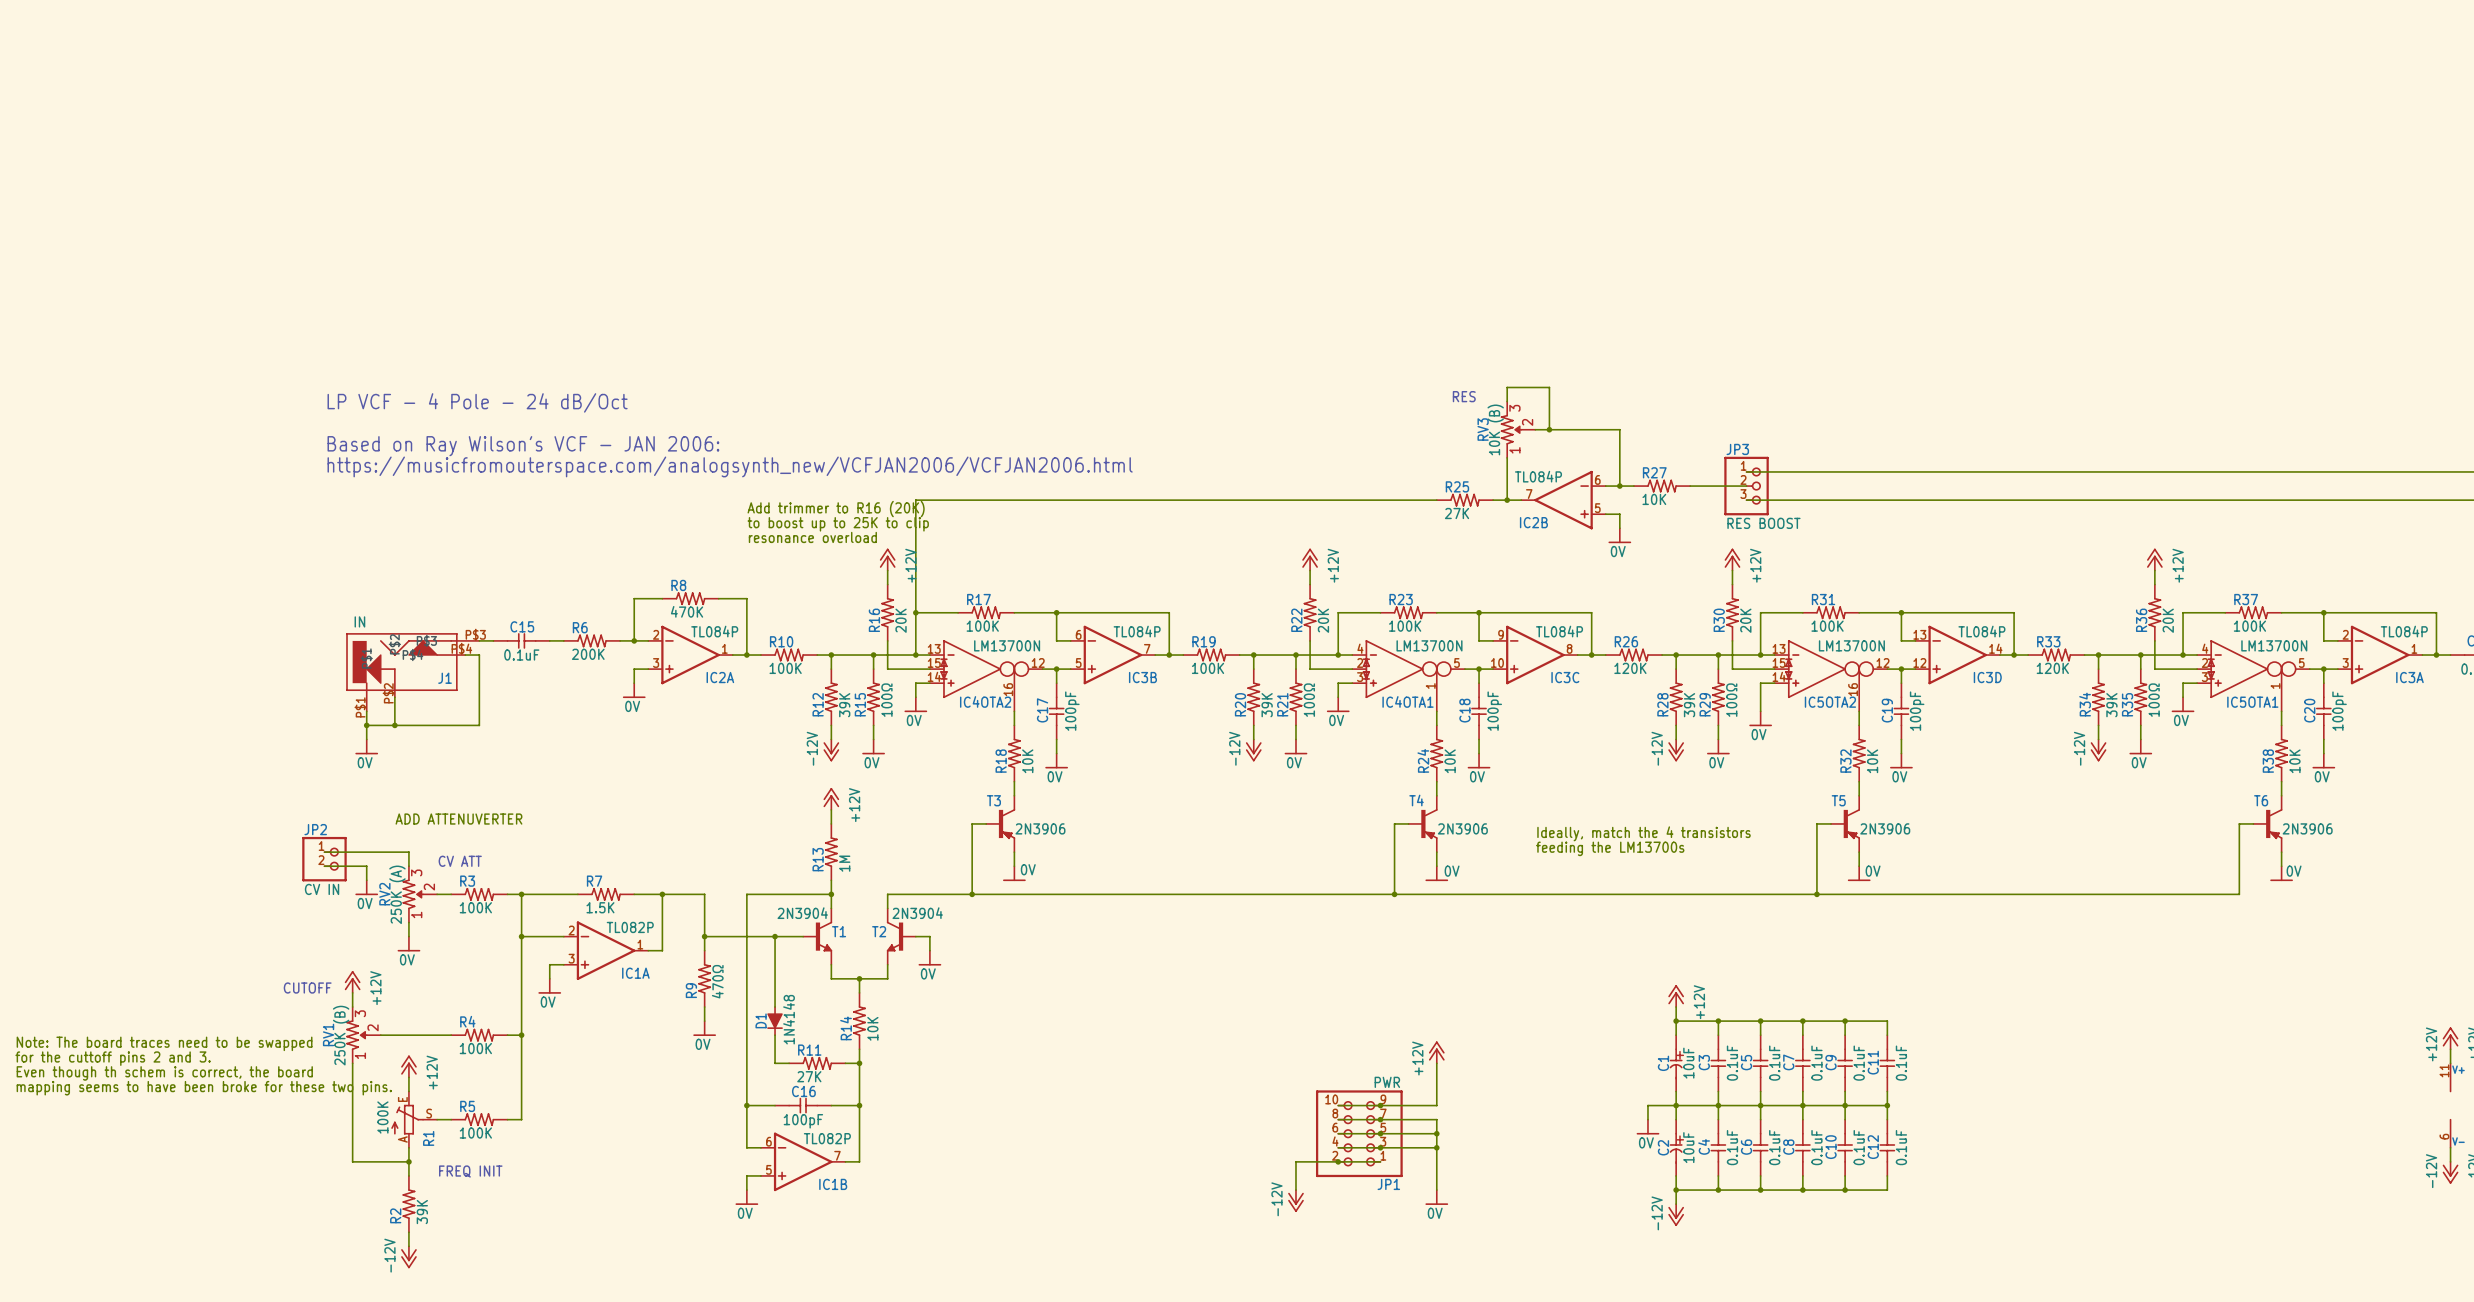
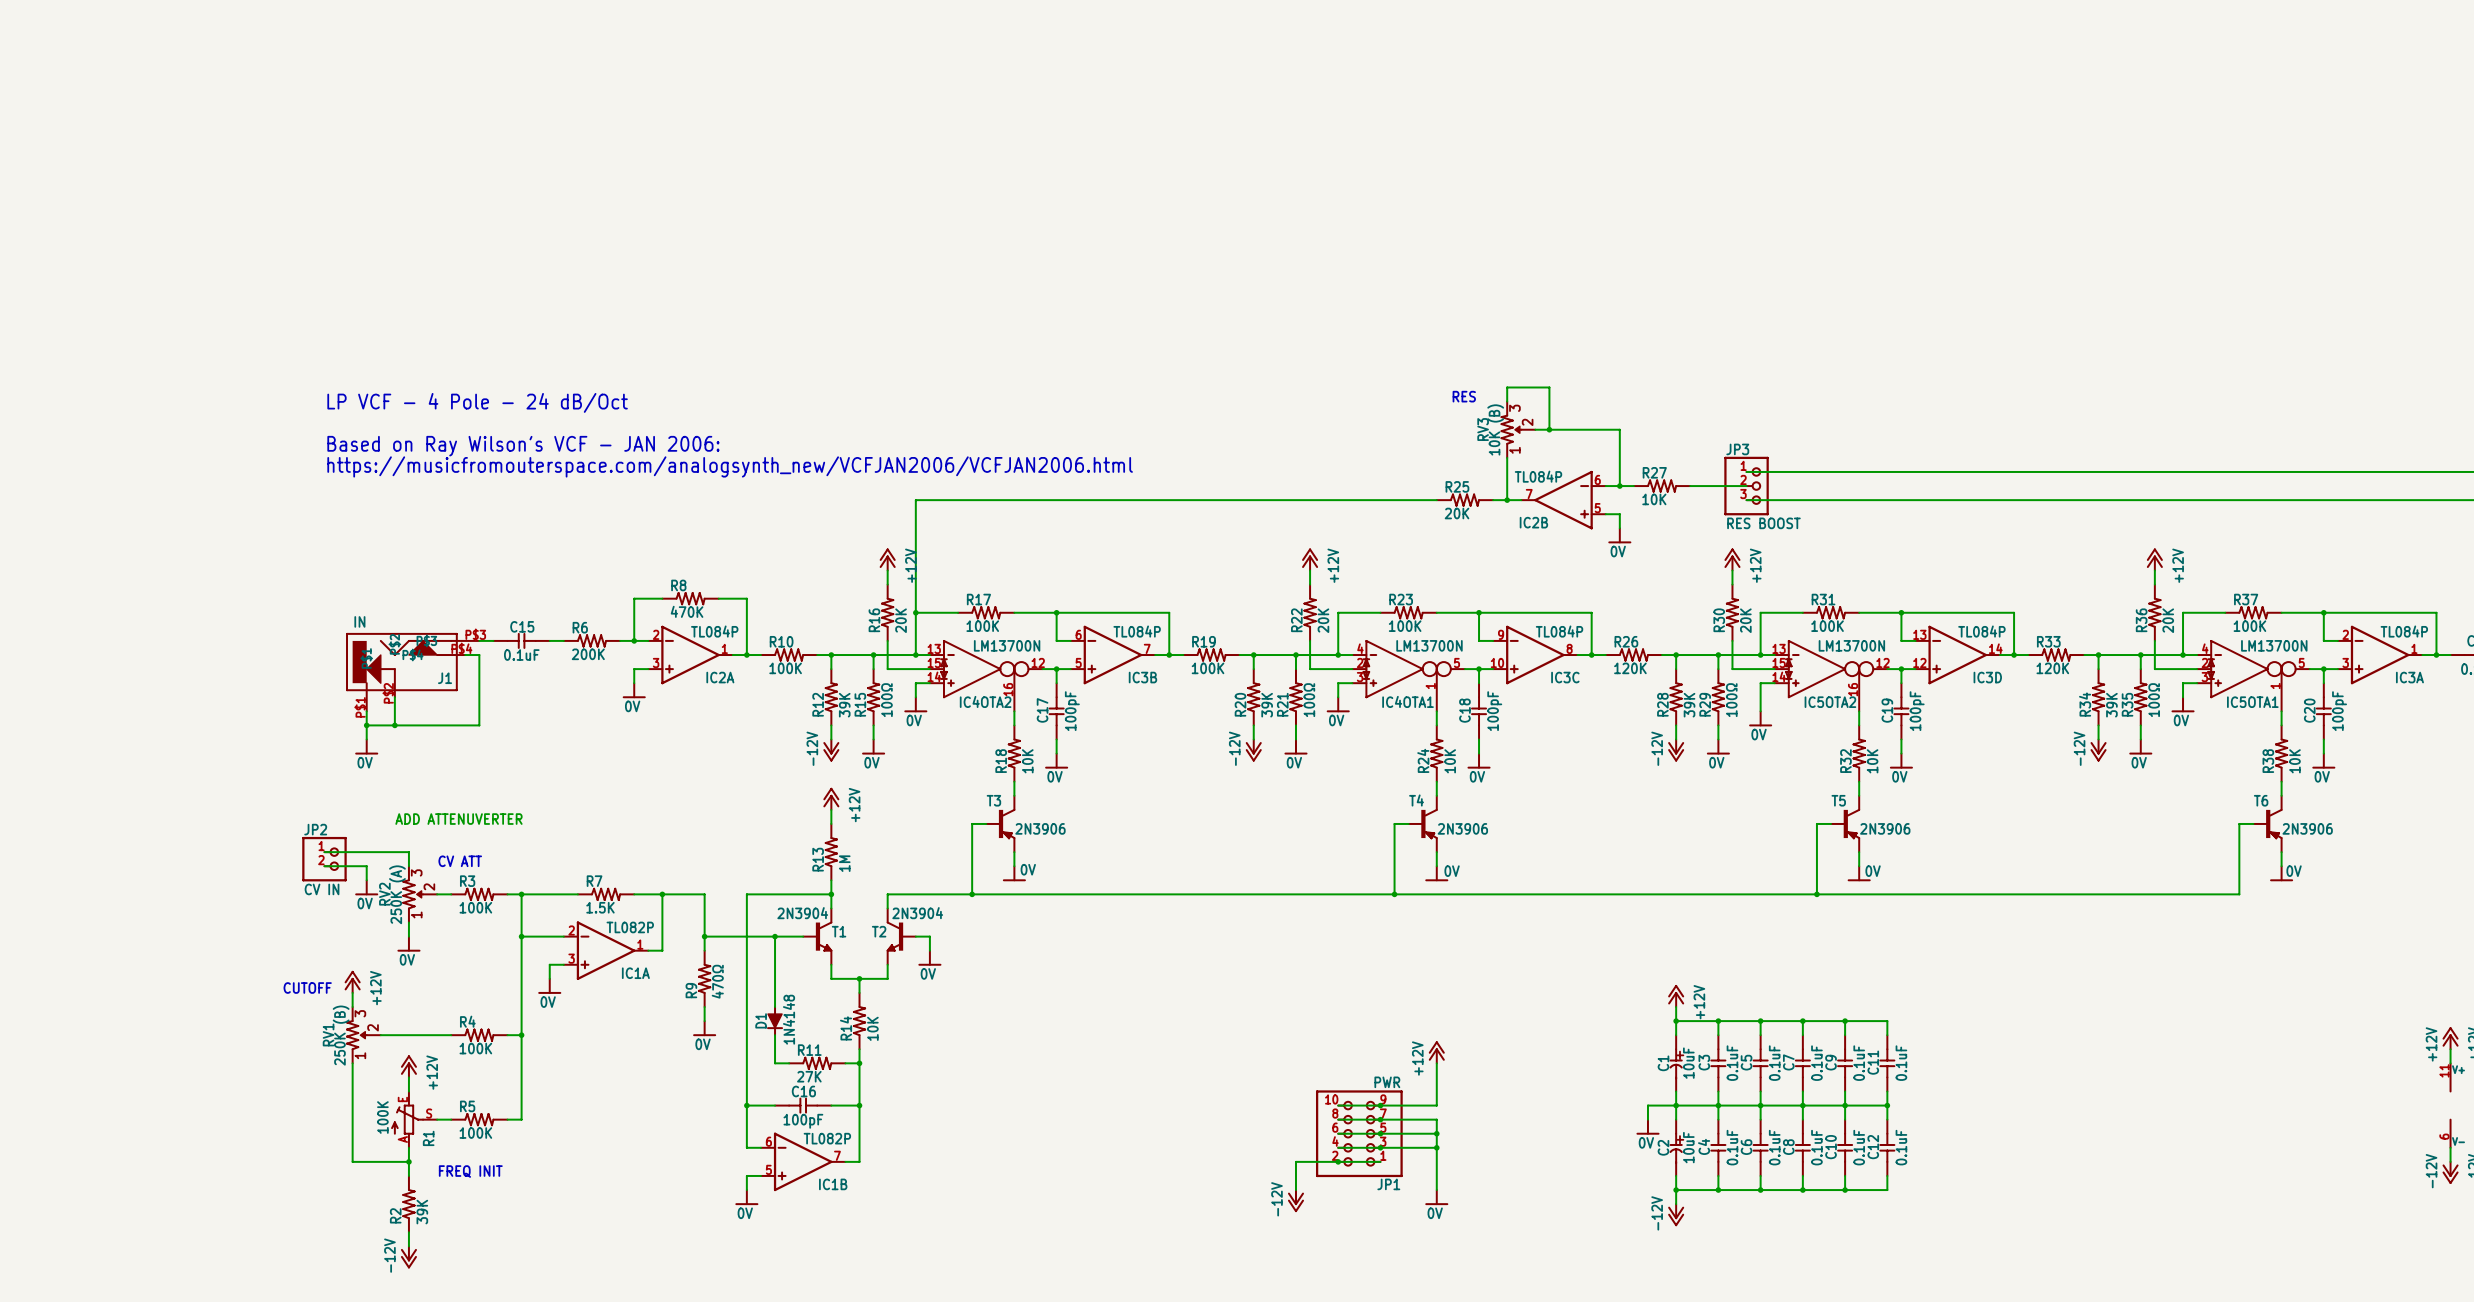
text: Add trimmer to R16 (20K) (836, 509) -> none
R25 value: 27K (1457, 513) -> 20K (1457, 513)
text: to boost up to 25K to clip (838, 524) -> none
text: resonance overload (812, 537) -> none
text: Ideally, match the 4 transistors (1644, 833) -> none
text: feeding the LM13700s (1610, 848) -> none
text: Note: The board traces need to be swapped (164, 1043) -> none
text: for the cuttoff pins 2 and 3. (113, 1058) -> none
text: Even though th schem is correct, the board (164, 1073) -> none
text: mapping seems to have been broke for these two pins. (204, 1088) -> none

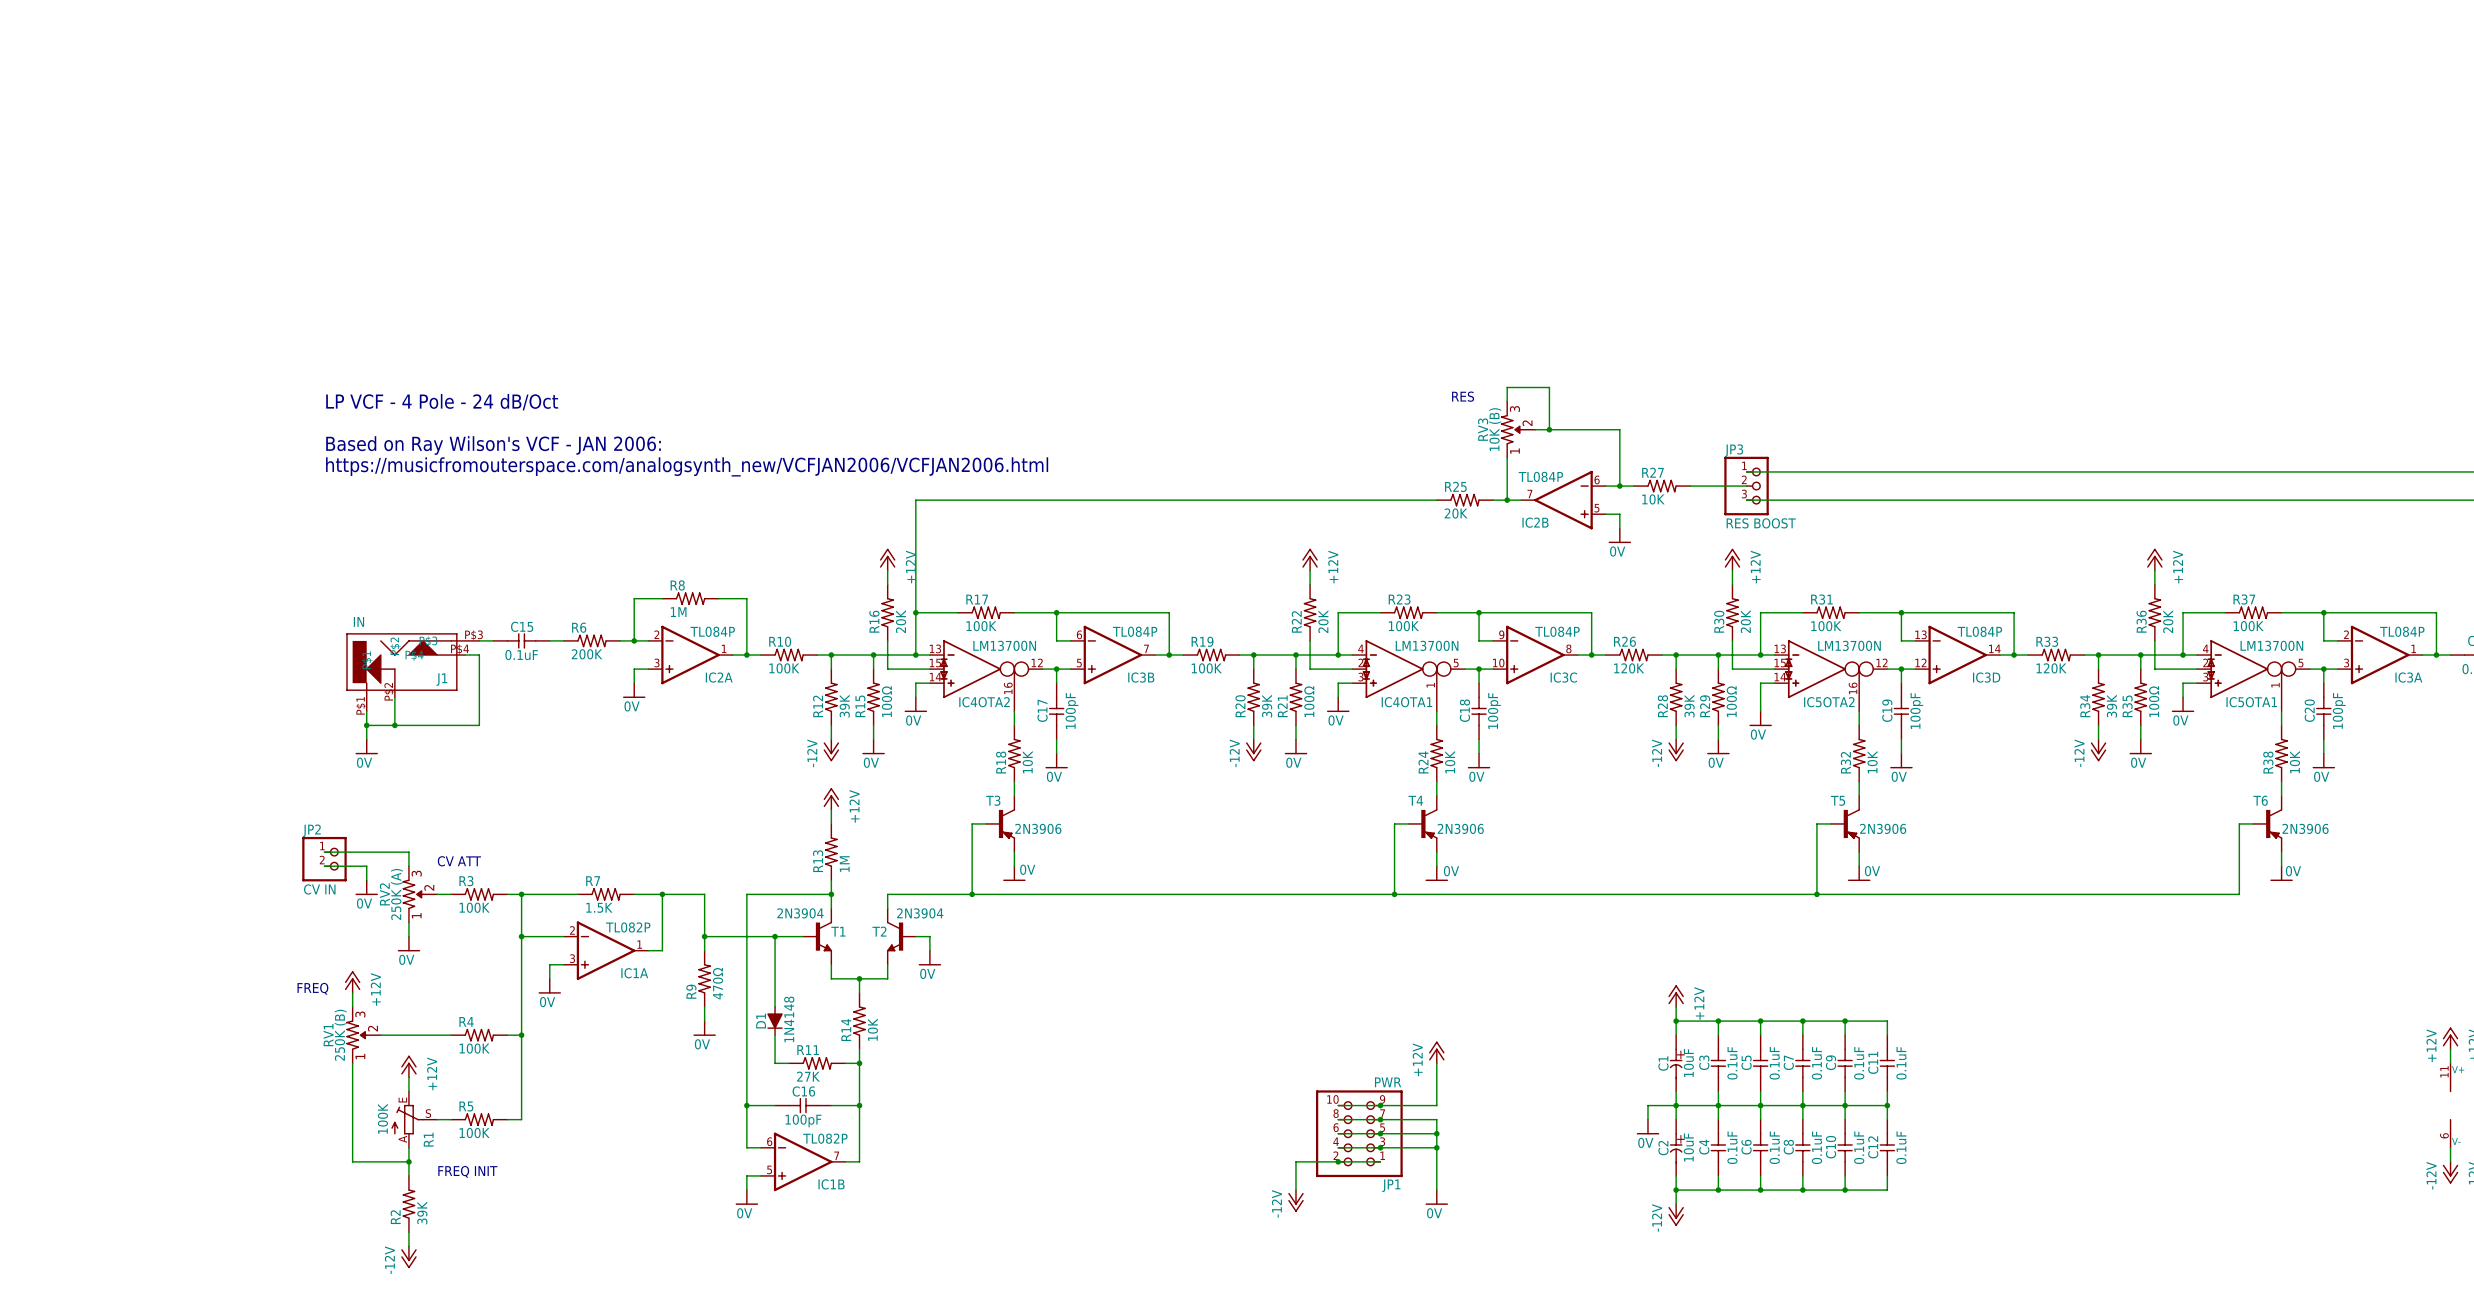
R8 value: 470K (687, 611) -> 1M (678, 612)
text: ADD ATTENUVERTER (458, 819) -> none
text: CUTOFF (307, 988) -> none
text: none -> FREQ (312, 988)

